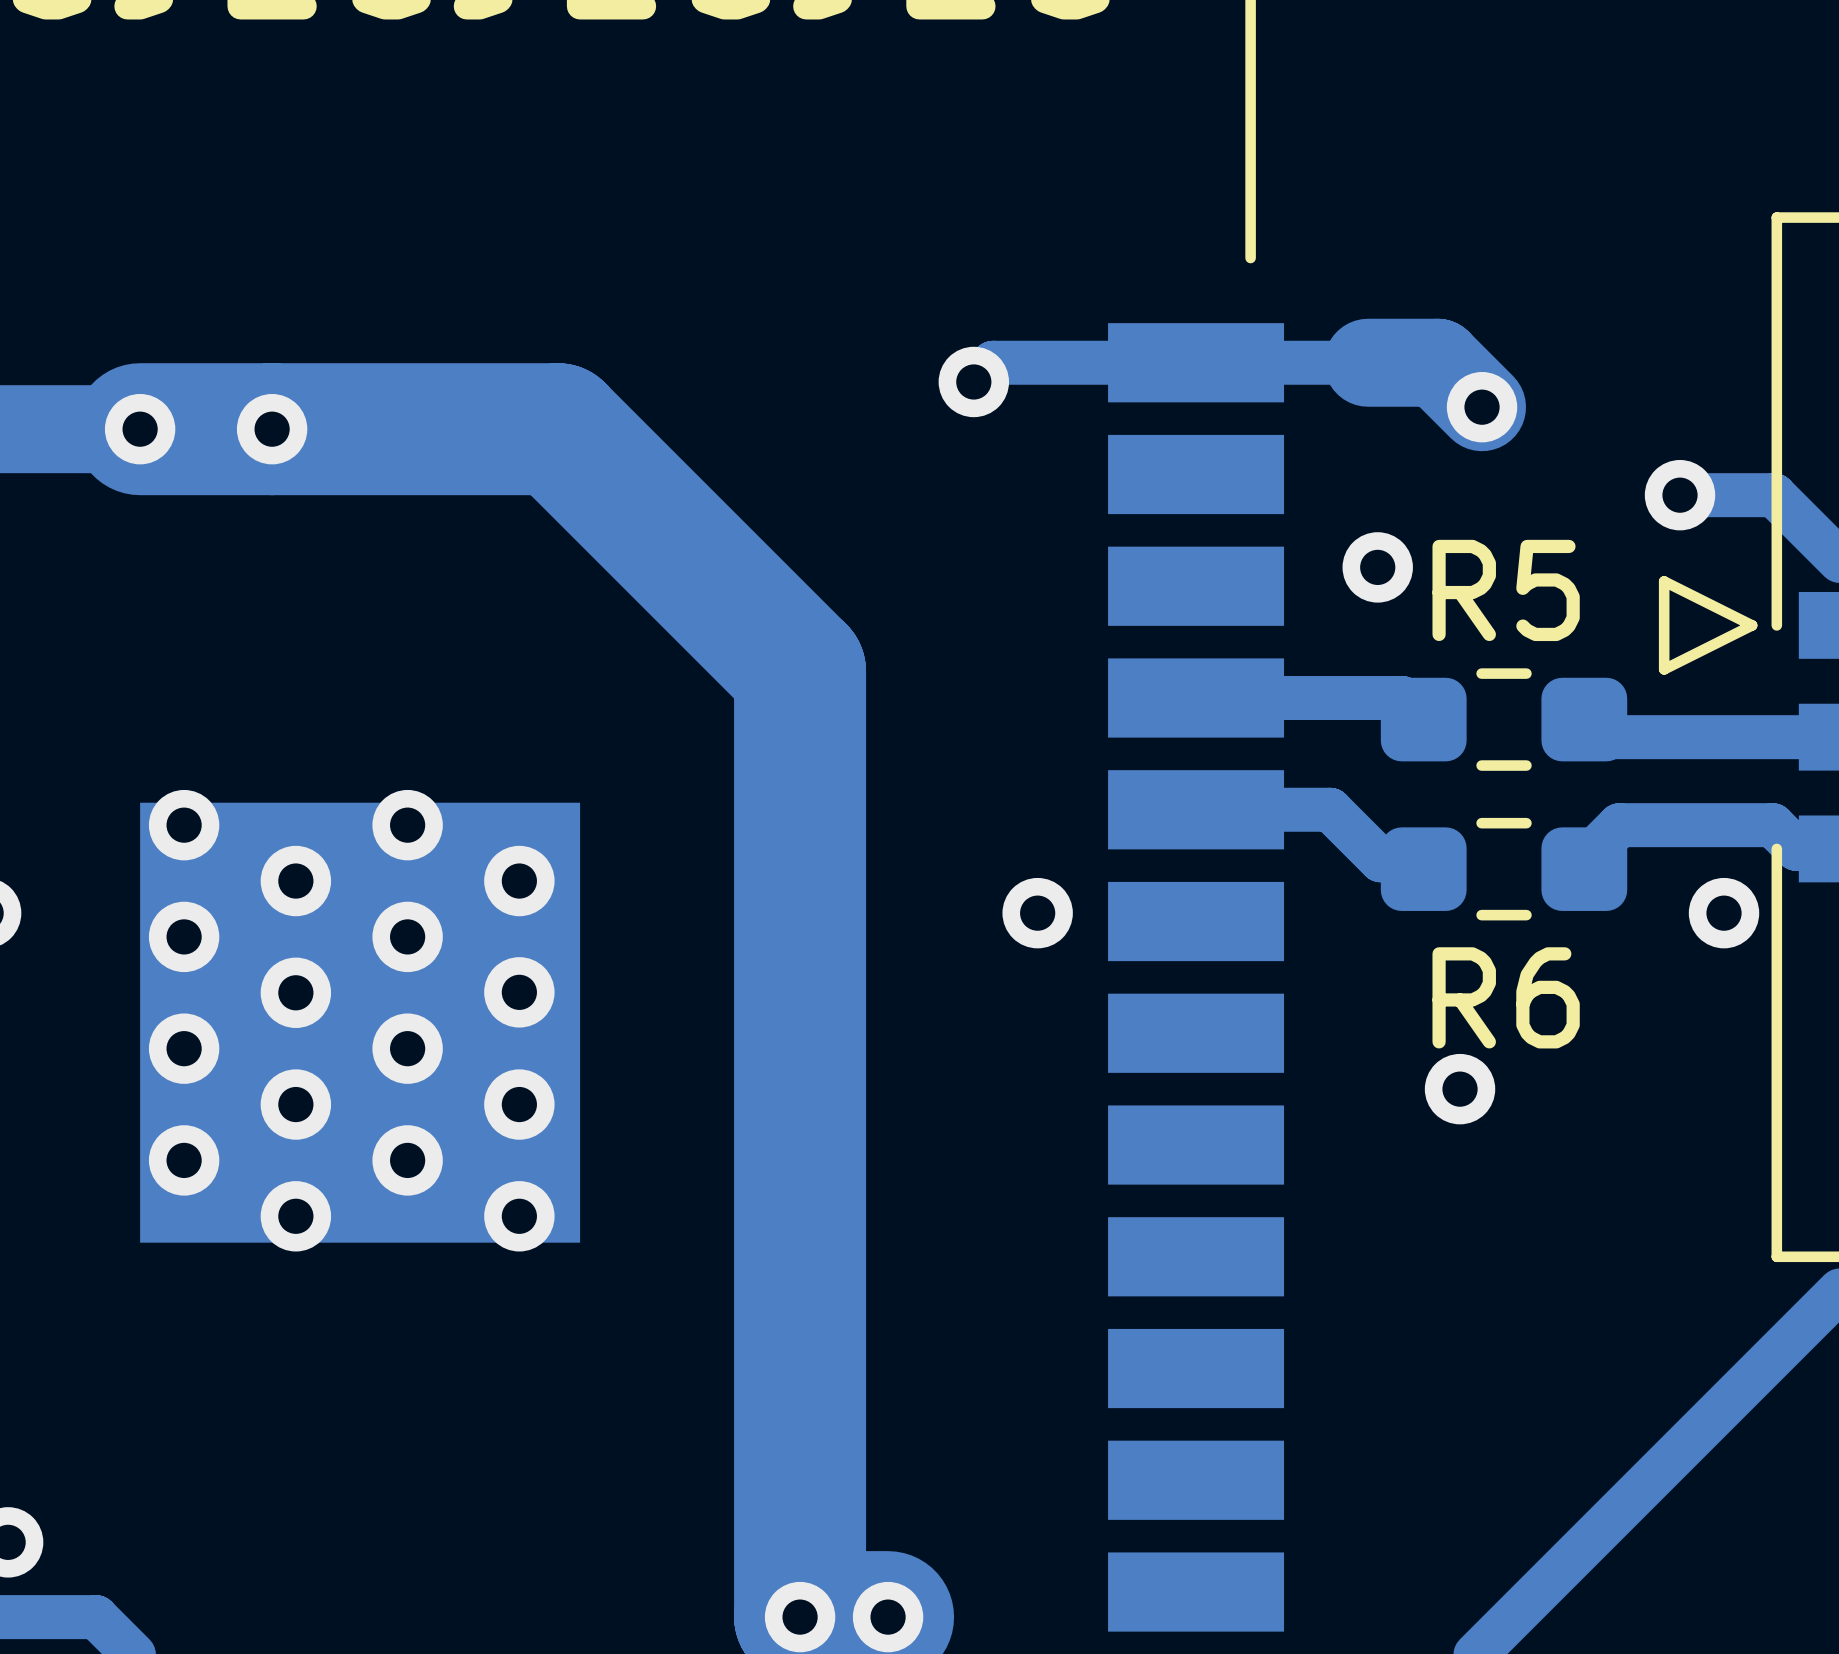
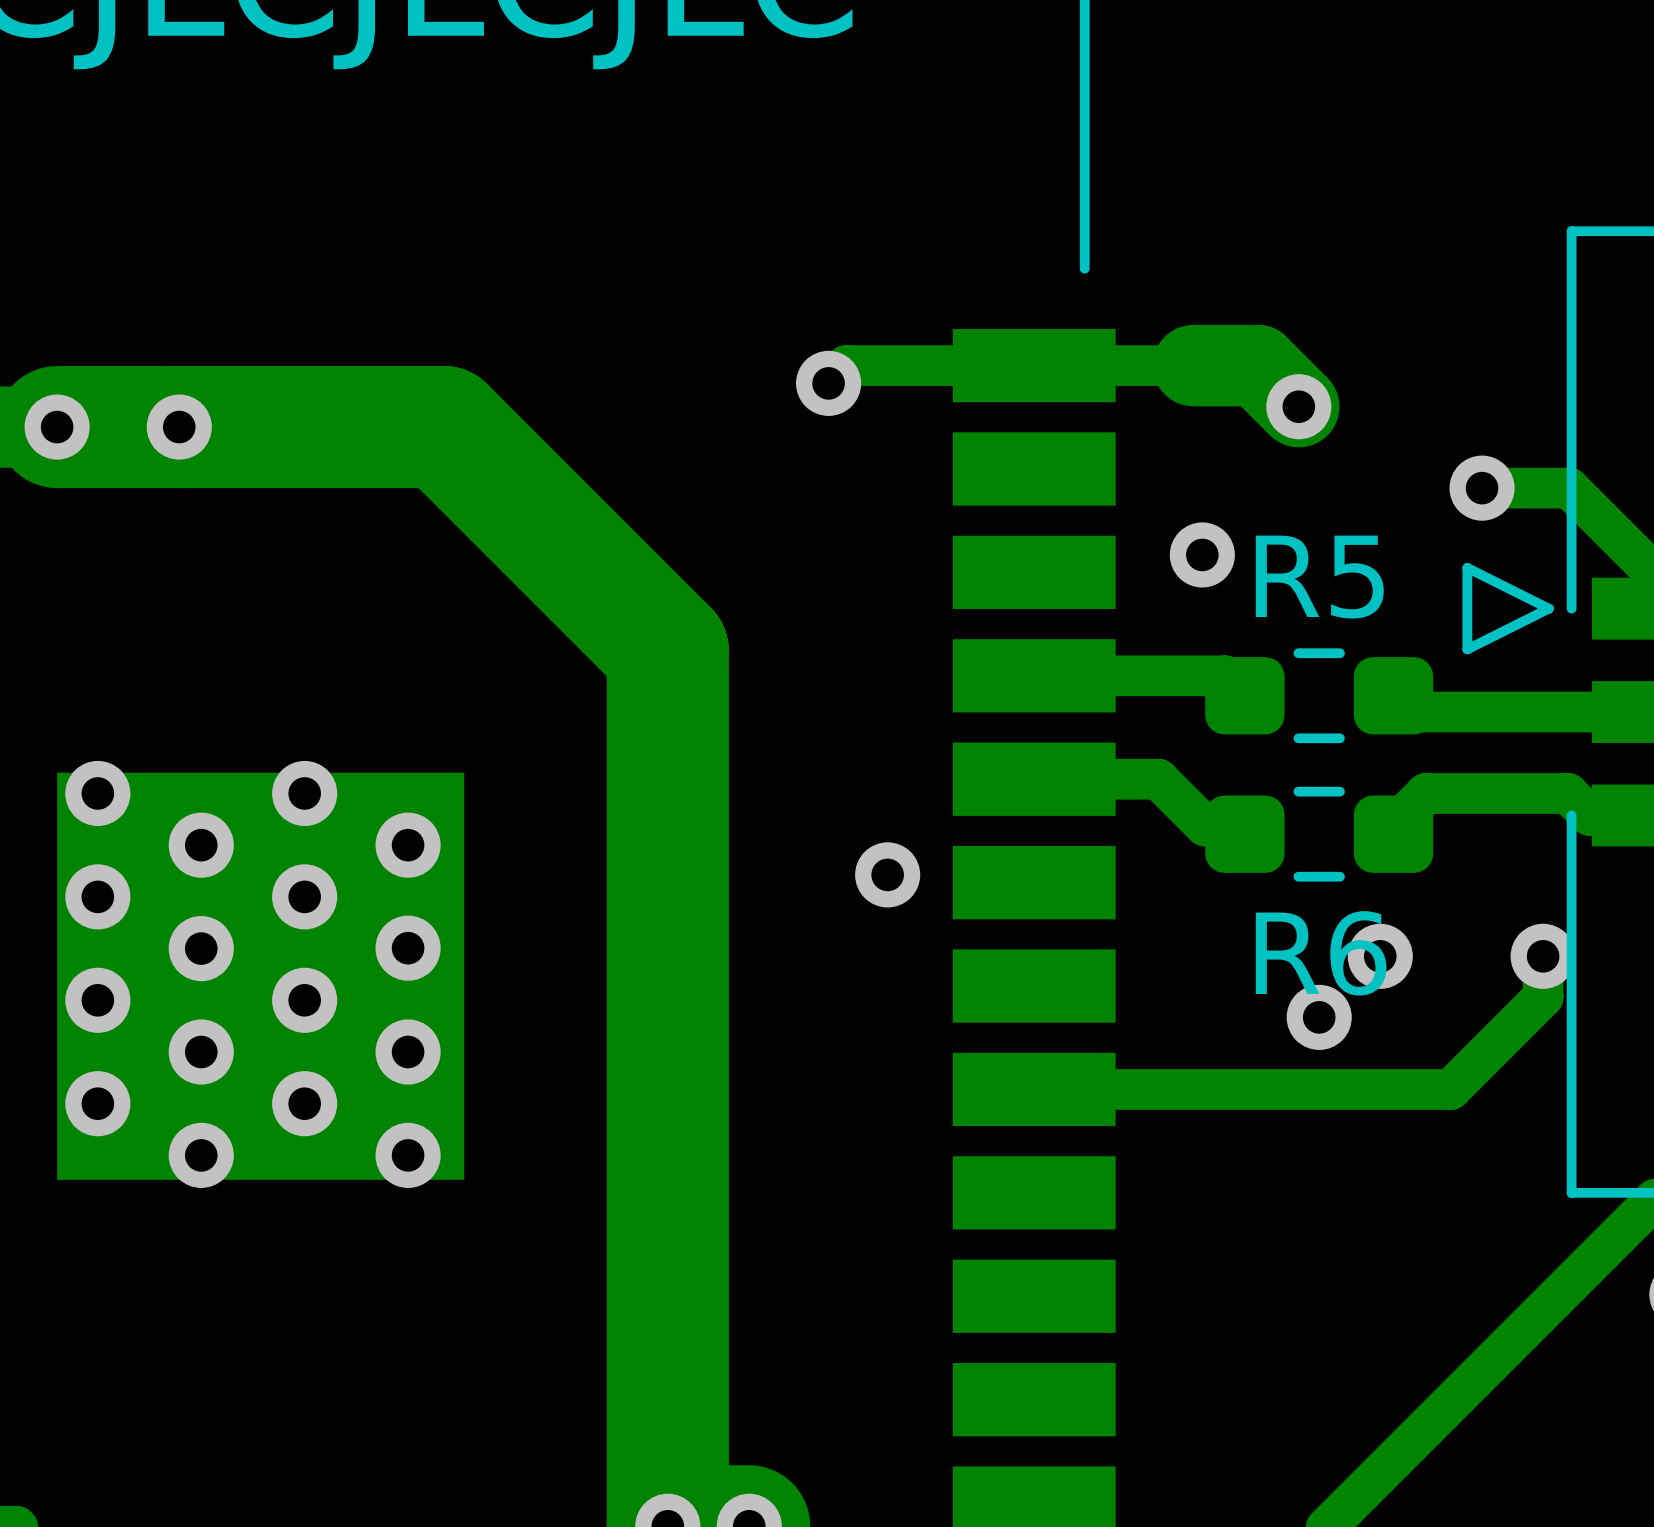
via: (1724, 913) -> none
via: none -> (1380, 956)
track: none -> (1543, 956) (1543, 997) (1450, 1089) (1034, 1089)
via: none -> (1543, 956)
via position: (1460, 1089) -> (1319, 1017)

